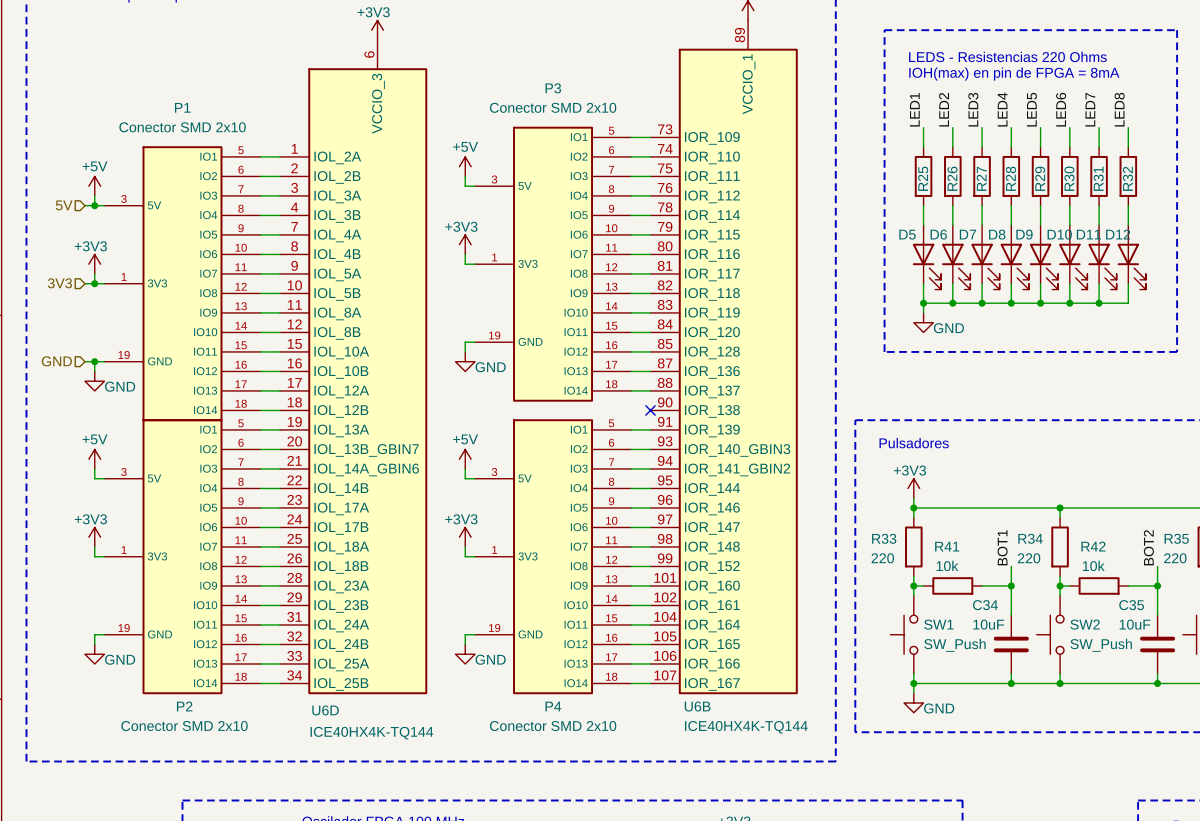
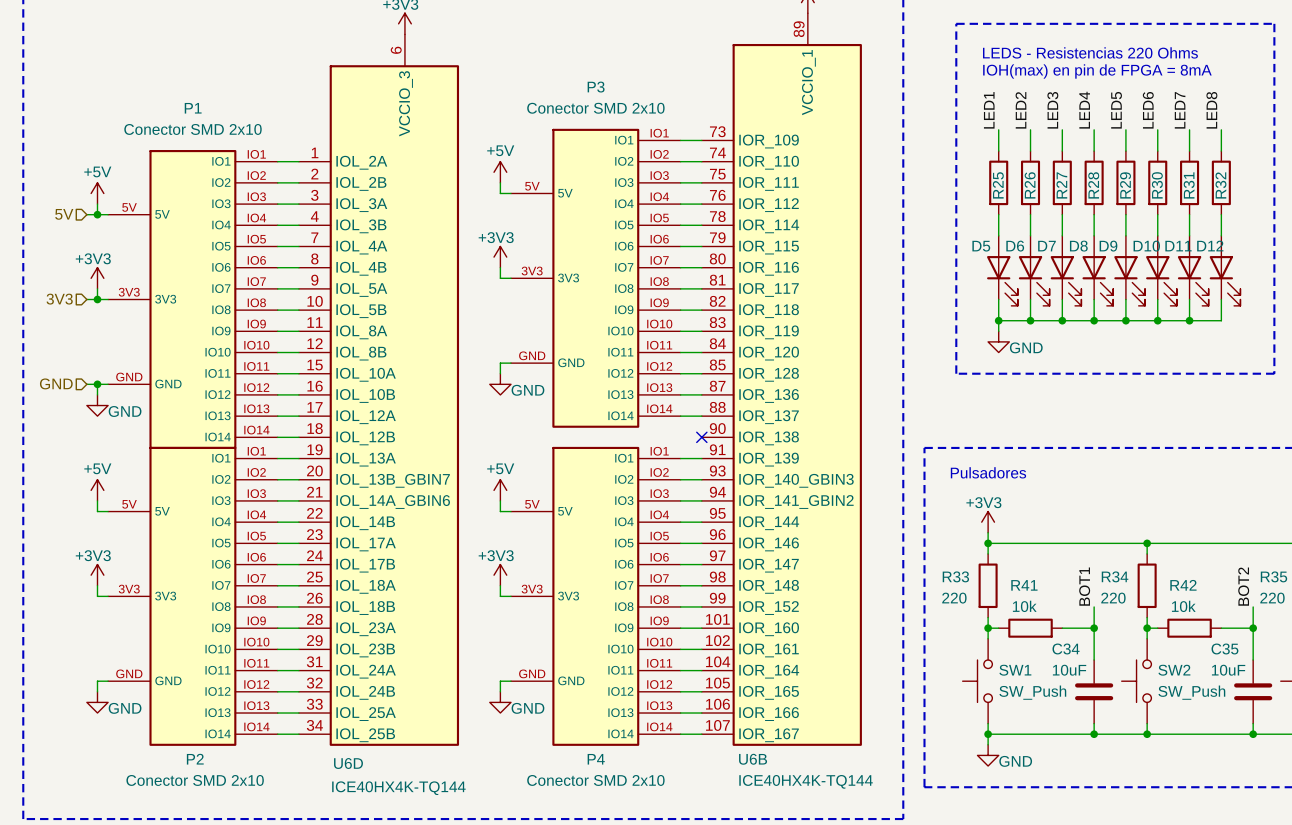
P3 symbol: [475, 126, 632, 402] -> [510, 128, 681, 428]
P1 symbol: [104, 146, 261, 422] -> [108, 150, 278, 450]
P2 symbol: [104, 419, 261, 695] -> [108, 446, 278, 746]
P4 symbol: [475, 419, 632, 695] -> [510, 446, 681, 746]

